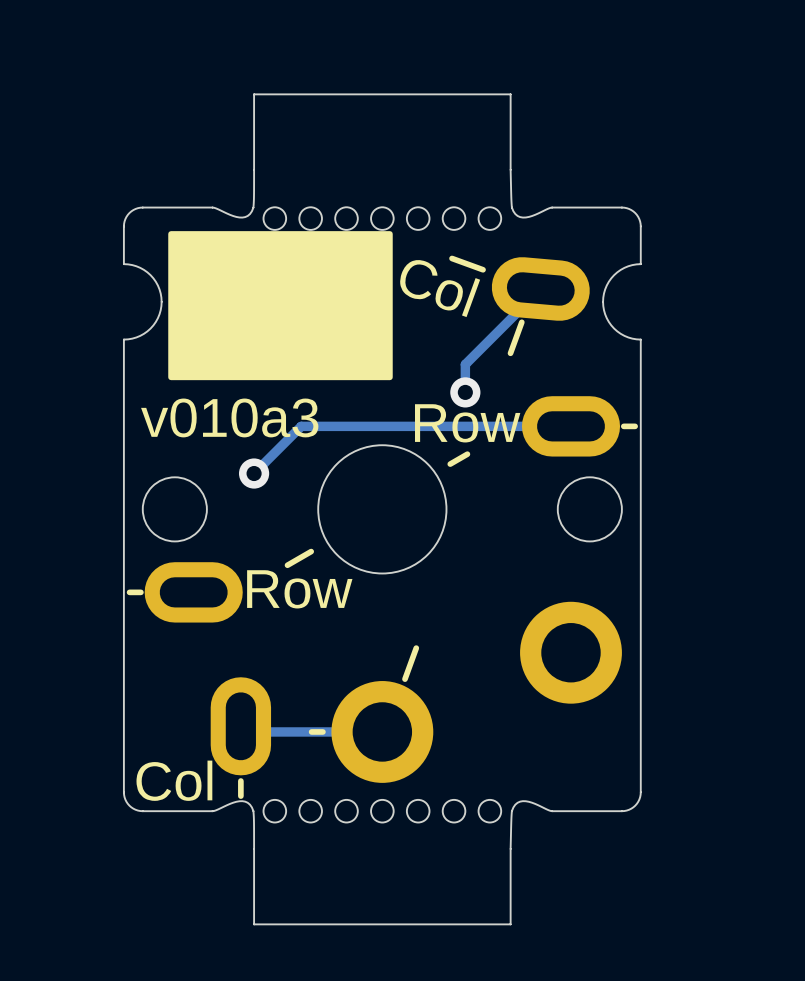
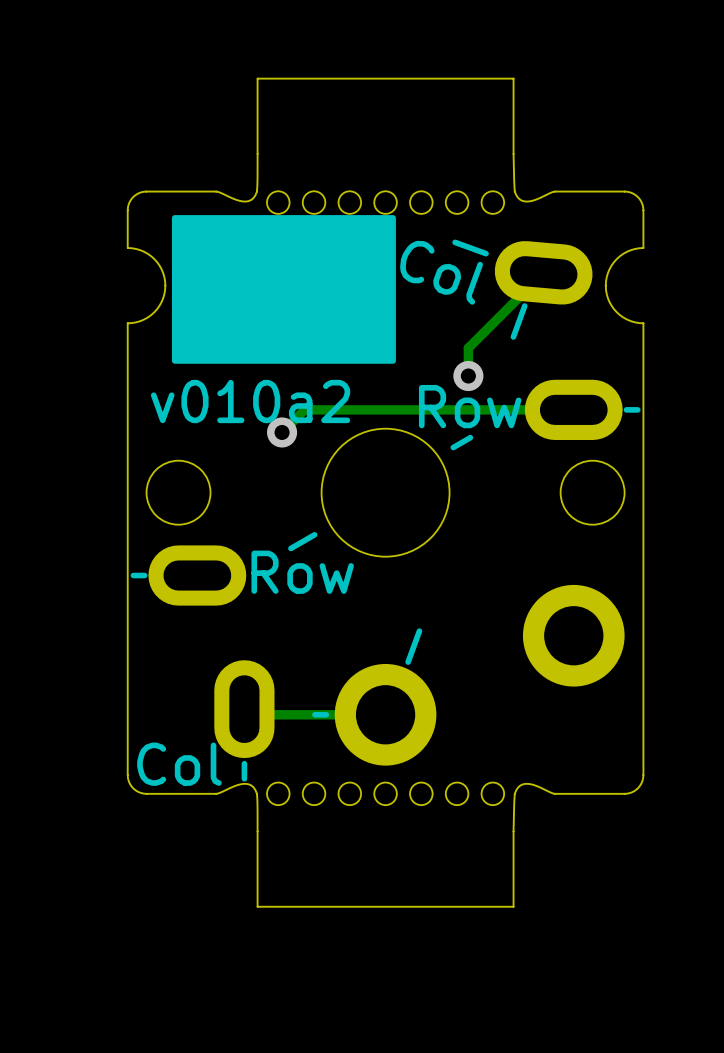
text: v010a3 (229, 417) -> v010a2 (250, 401)
track: (278, 449) (254, 473) -> none
via position: (254, 473) -> (282, 432)

